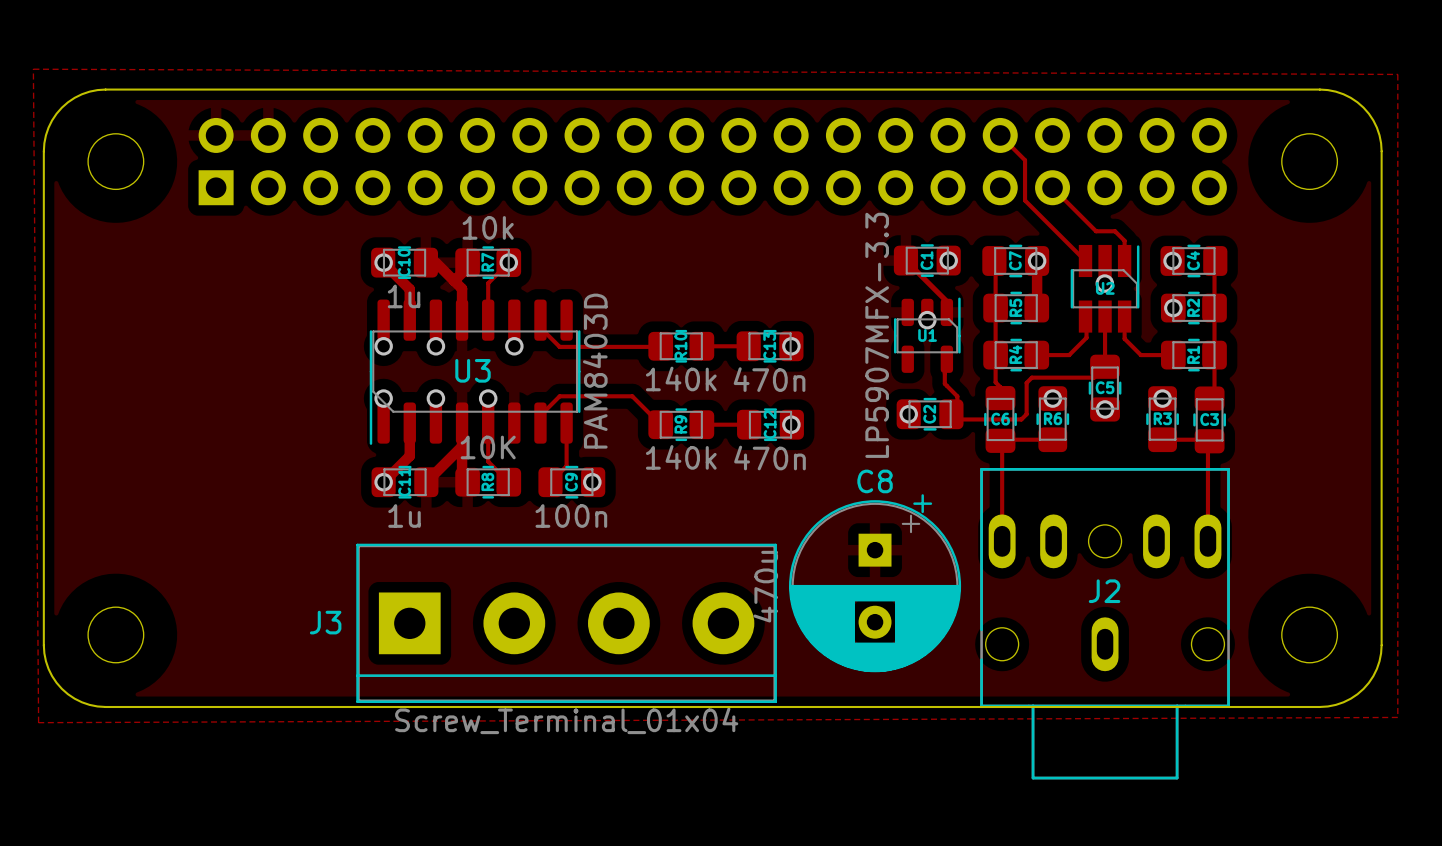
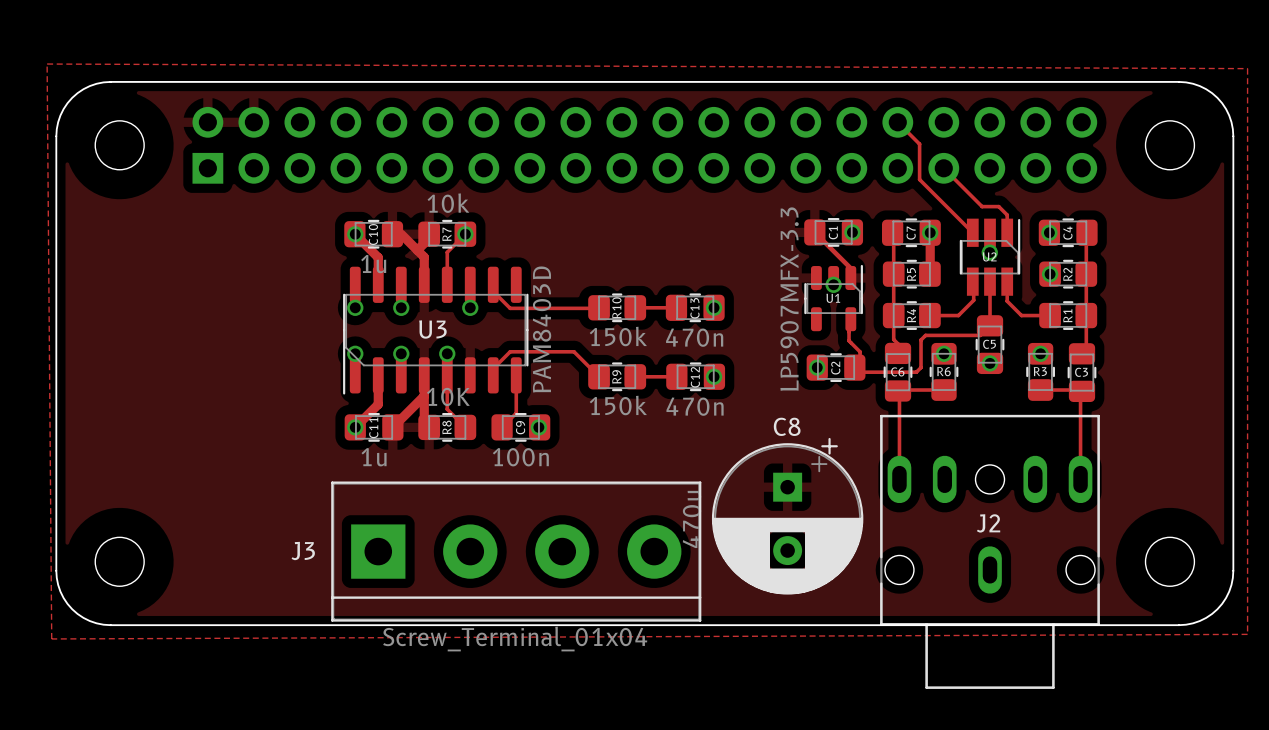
R10 value: 140k (681, 378) -> 150k (618, 336)
R9 value: 140k (681, 457) -> 150k (618, 405)

